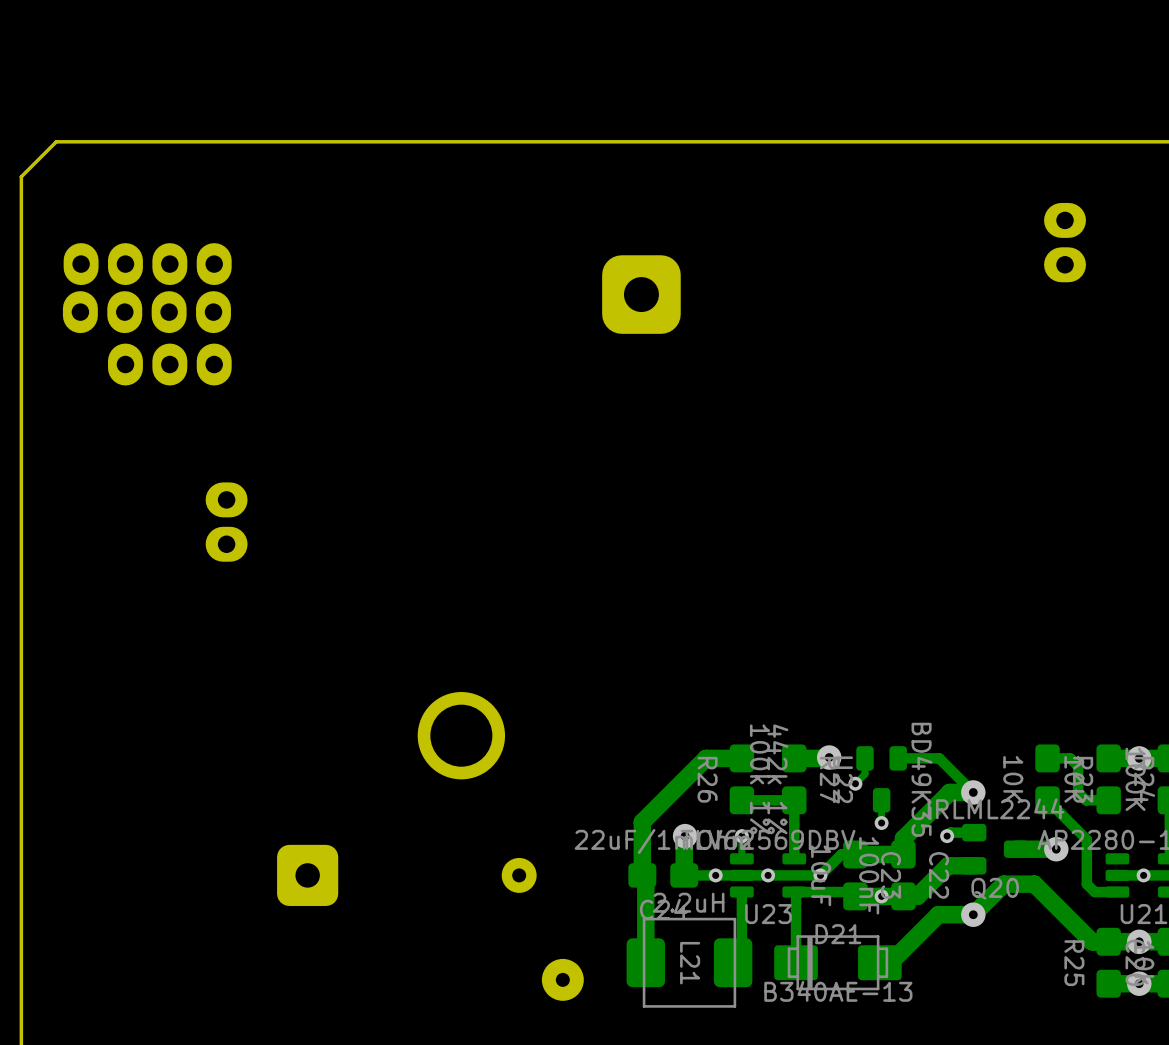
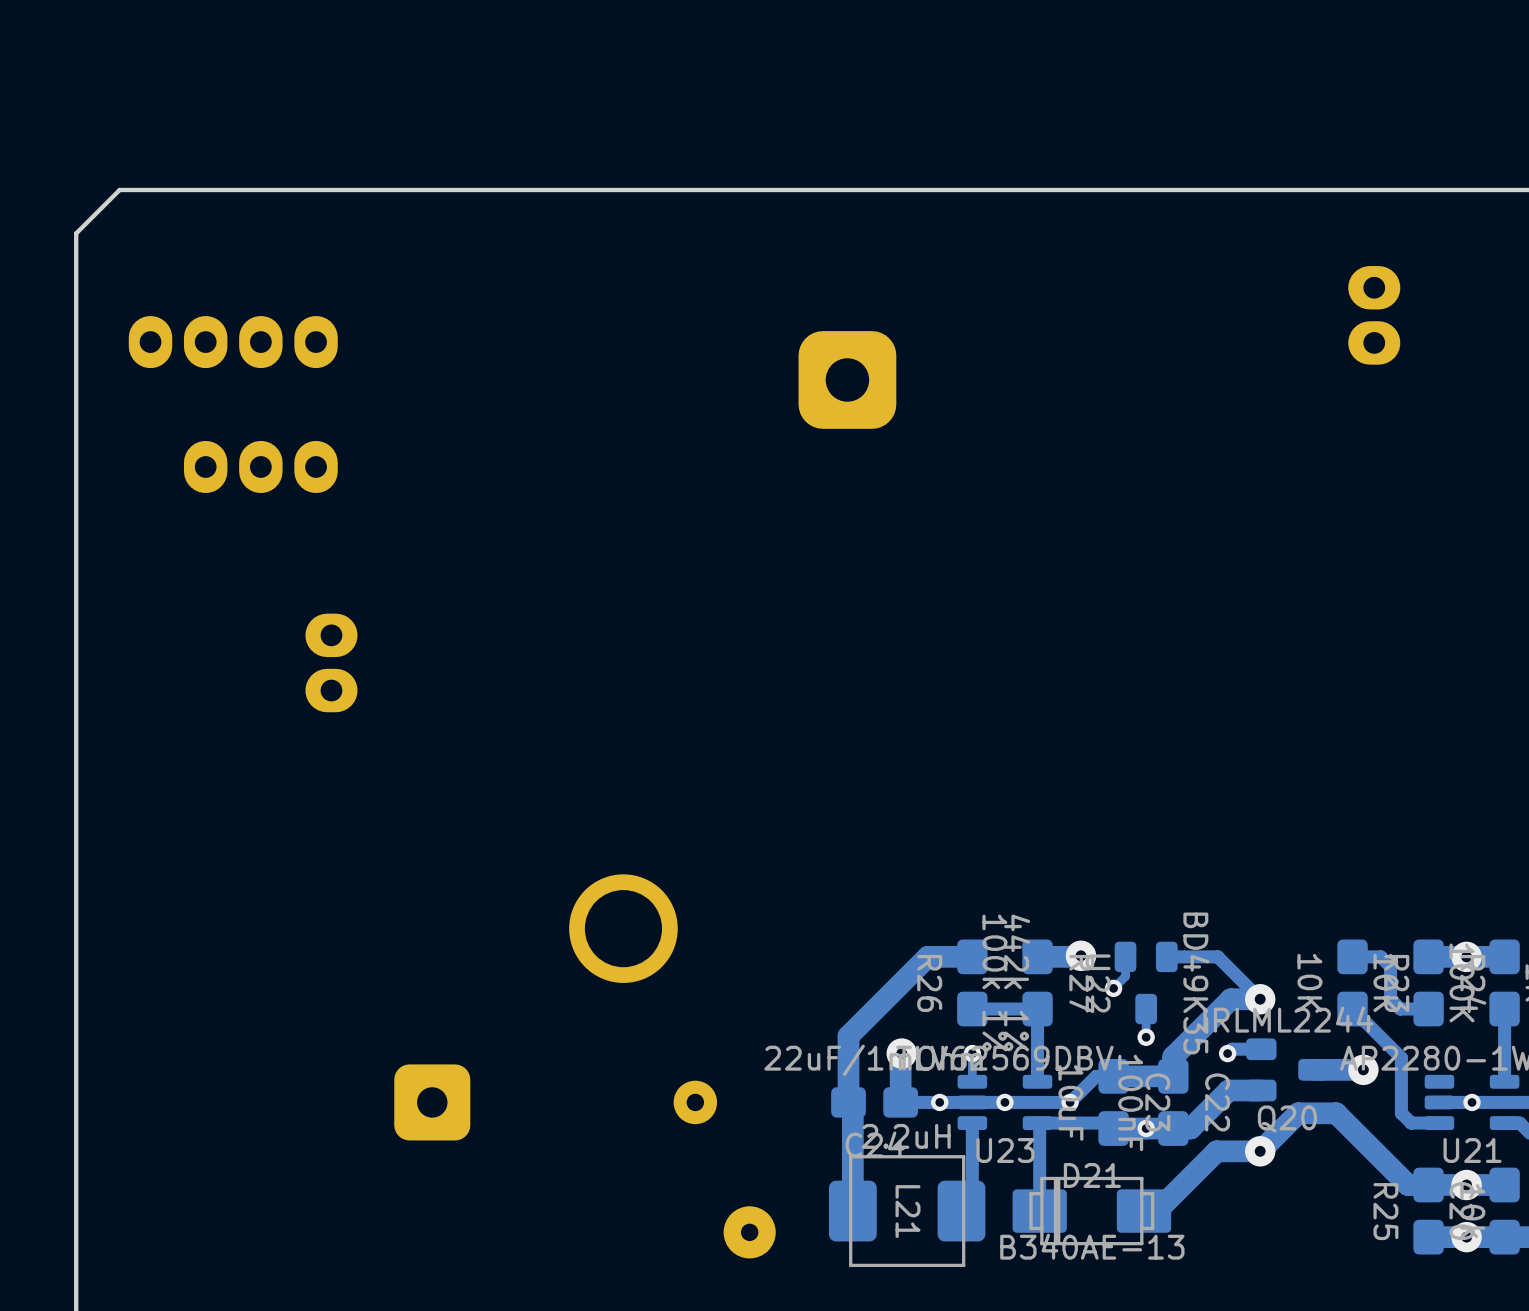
part: (146, 312) -> none

